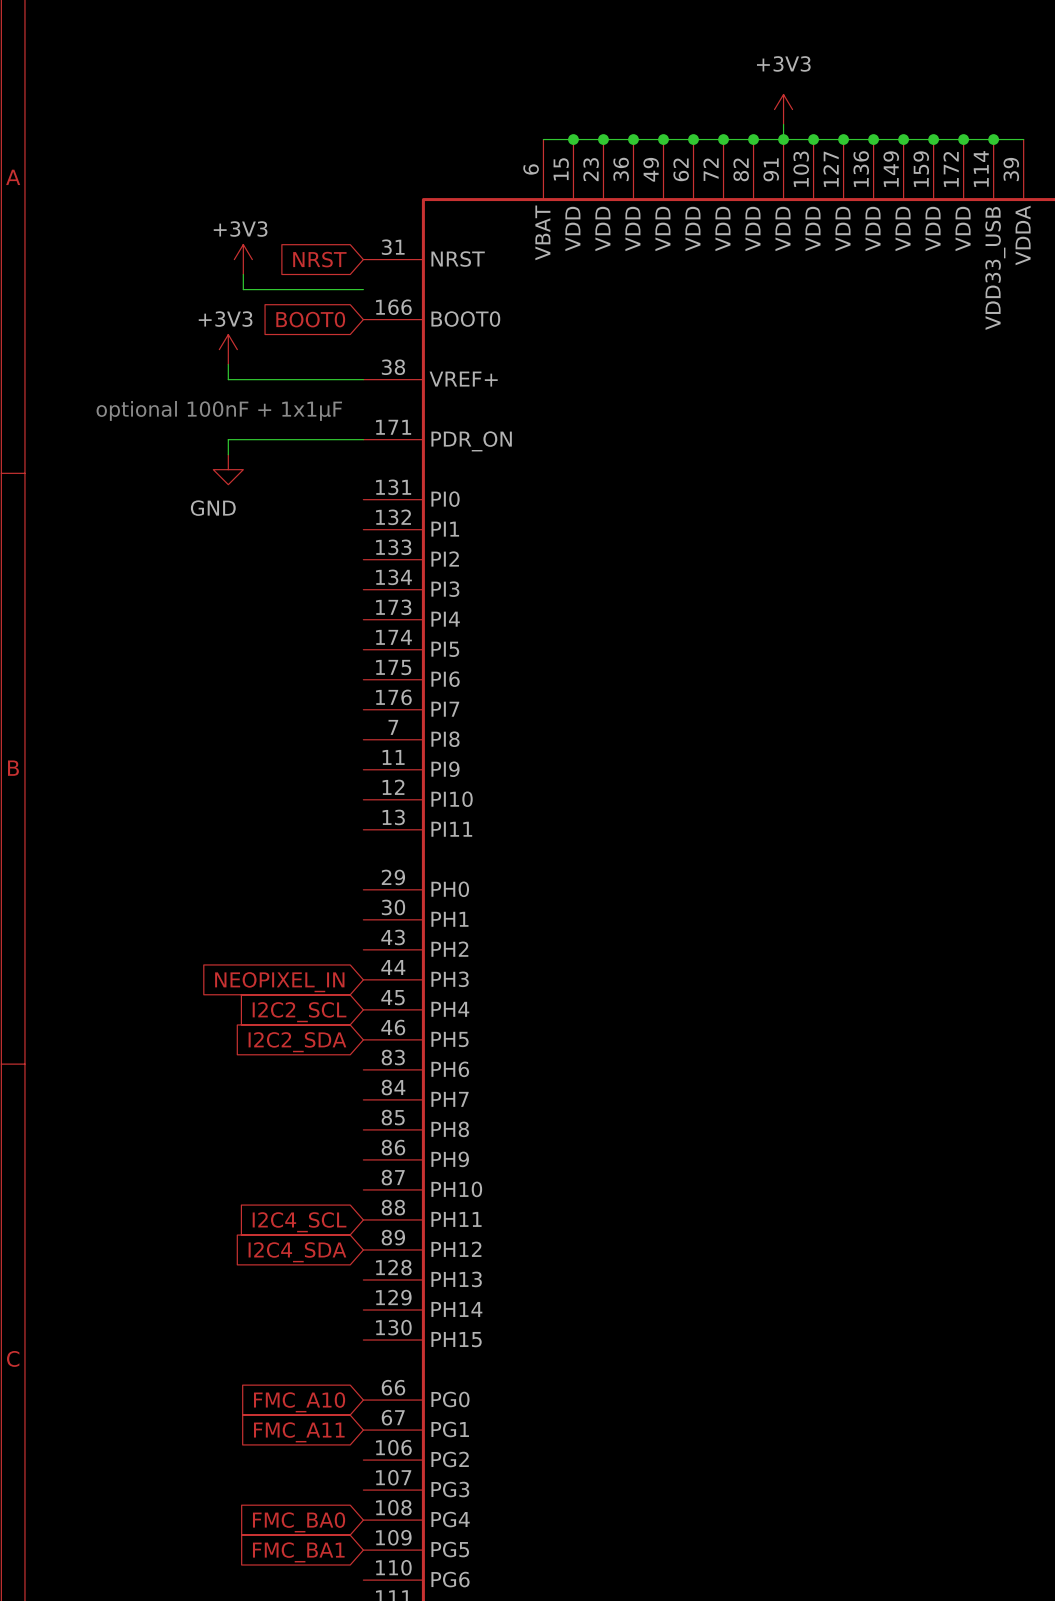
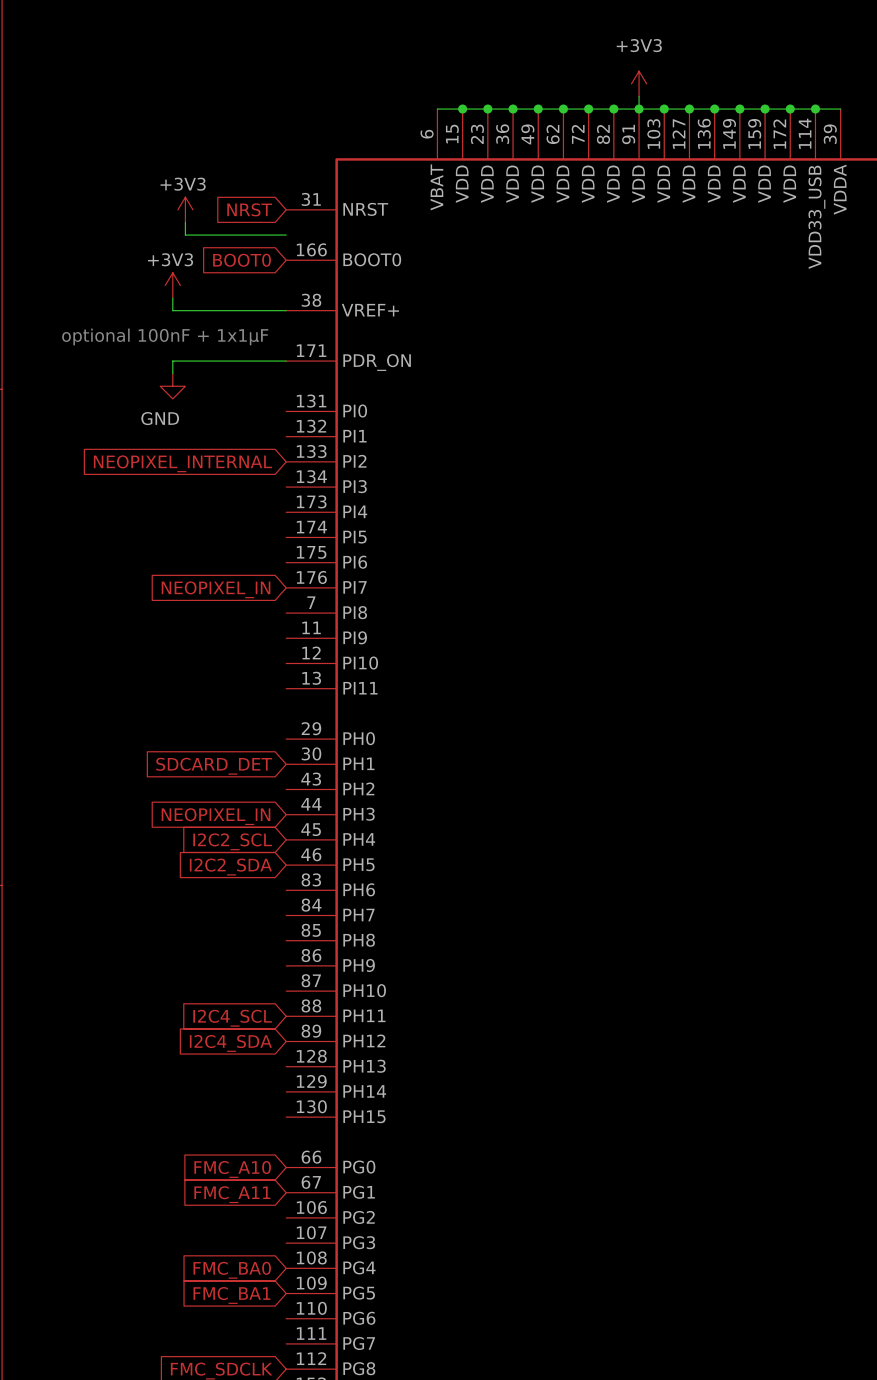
global label: none -> NEOPIXEL_INTERNAL (182, 463)
global label: none -> NEOPIXEL_IN (216, 589)
global label: none -> SDCARD_DET (214, 766)

